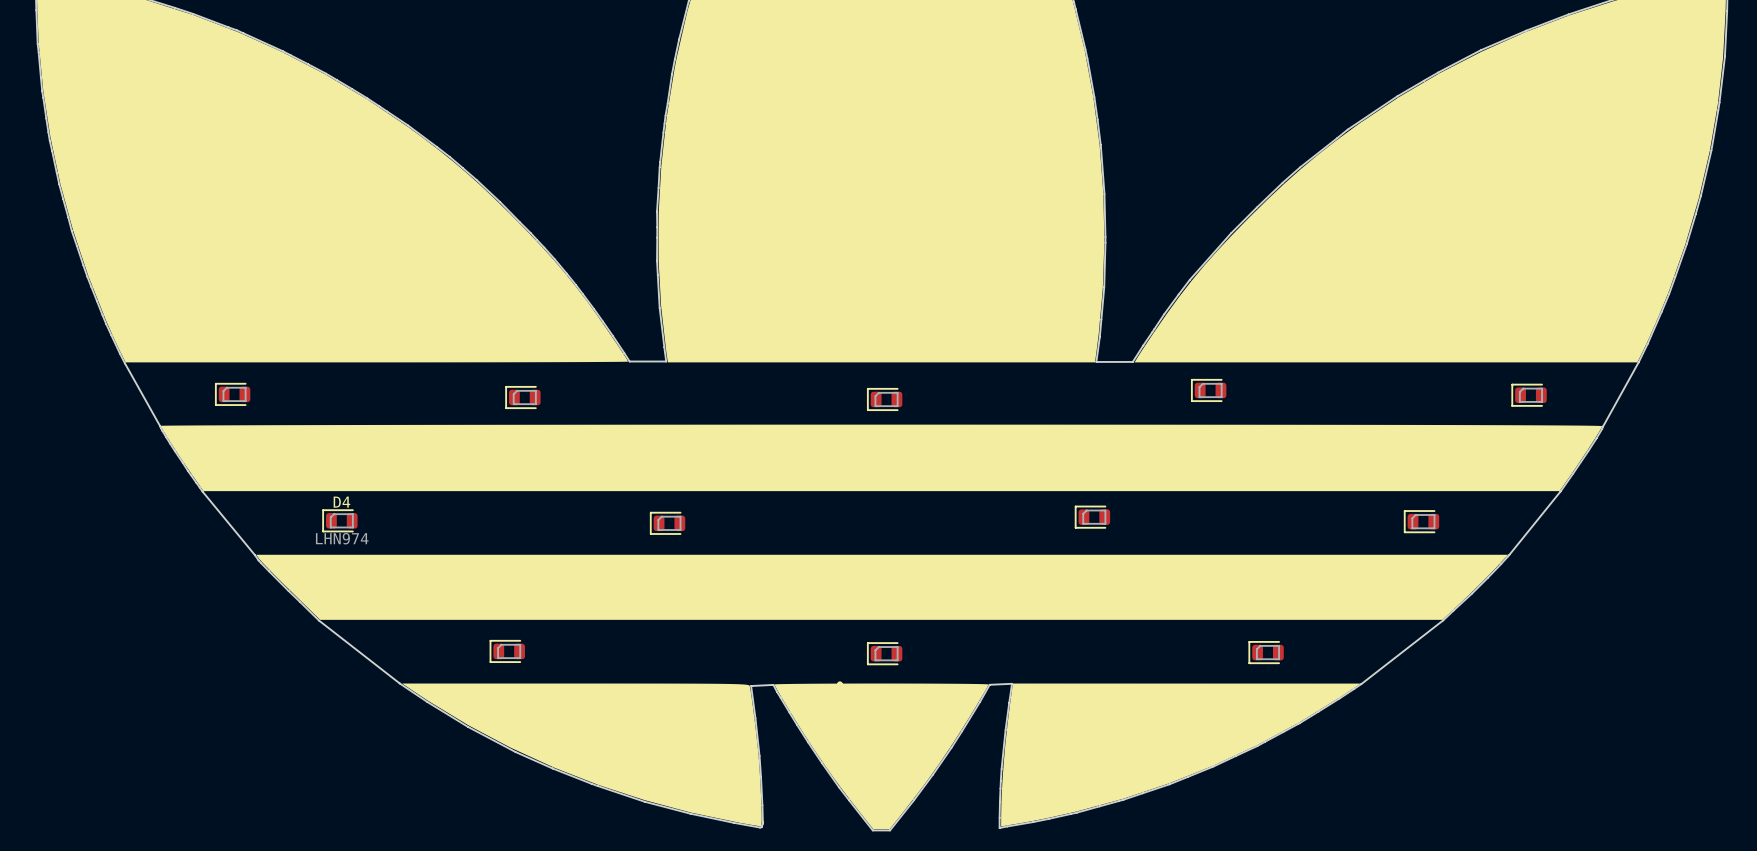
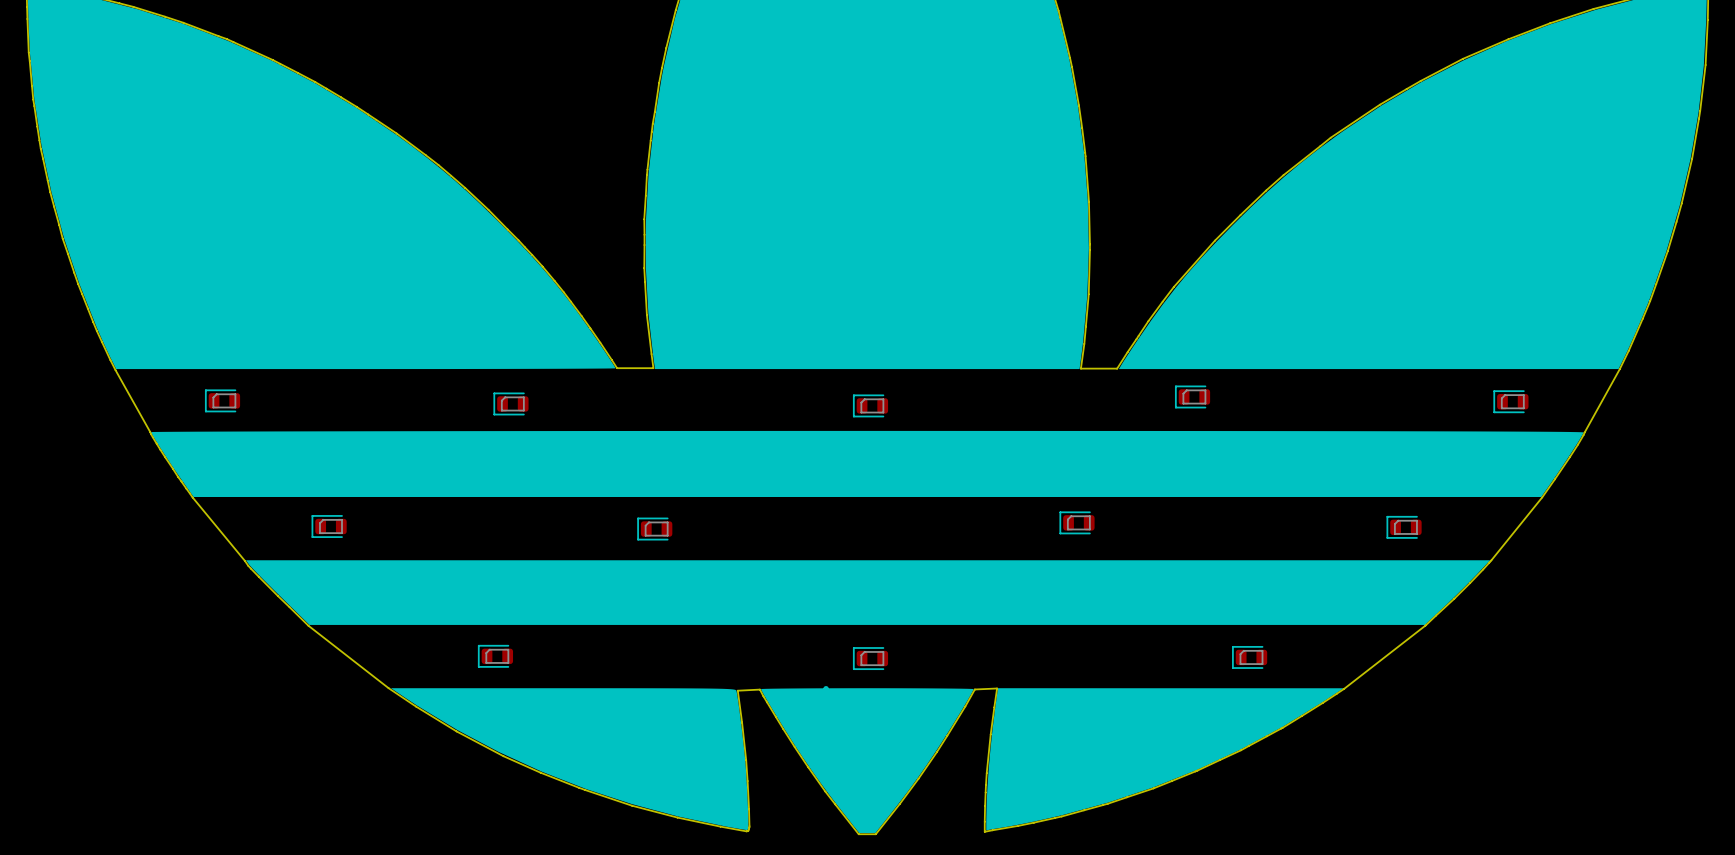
D4 name: D4 (341, 502) -> none
D4 value: LHN974 (342, 538) -> none

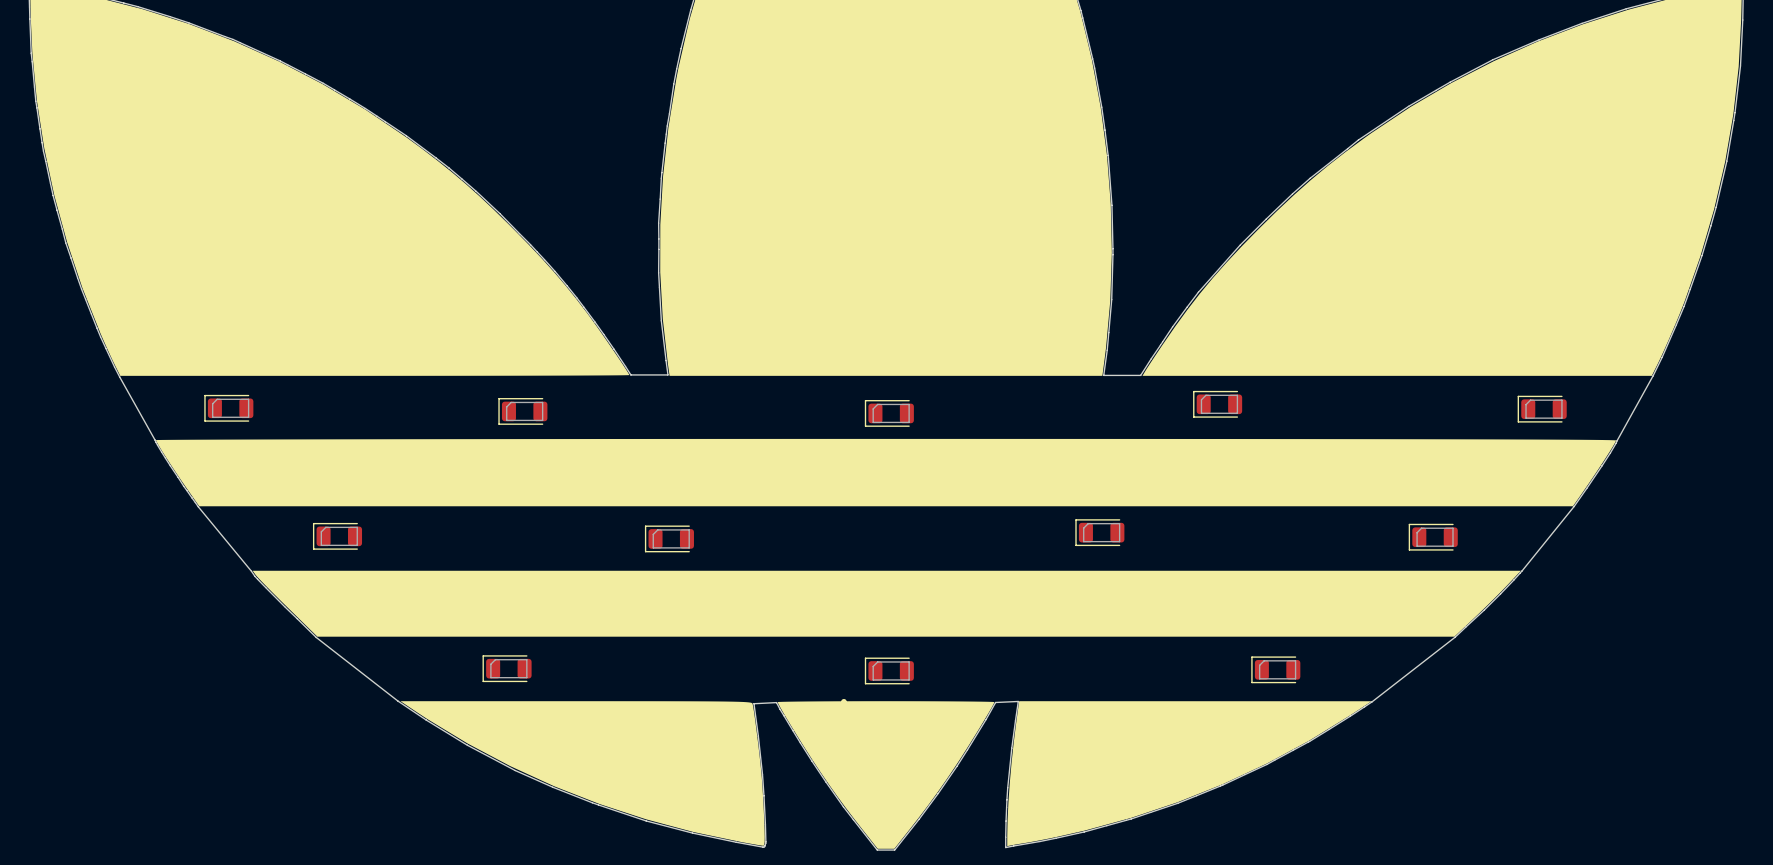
part footprint: [1175, 385, 1211, 409] -> [1193, 390, 1243, 418]
part footprint: [205, 389, 241, 413] -> [204, 394, 254, 422]
part footprint: [1493, 390, 1529, 413] -> [1517, 395, 1567, 423]
part footprint: [493, 392, 529, 416] -> [498, 398, 548, 425]
part footprint: [853, 394, 889, 418] -> [864, 400, 914, 427]
part footprint: [1059, 511, 1095, 535] -> [1075, 519, 1125, 547]
part footprint: [311, 515, 347, 538] -> [312, 522, 363, 550]
part footprint: [1386, 516, 1422, 539] -> [1408, 523, 1458, 551]
part footprint: [637, 517, 673, 541] -> [644, 525, 694, 553]
part footprint: [478, 645, 514, 668] -> [482, 655, 532, 683]
part footprint: [1232, 646, 1268, 669] -> [1251, 656, 1301, 684]
part footprint: [853, 647, 889, 670] -> [864, 657, 914, 685]

